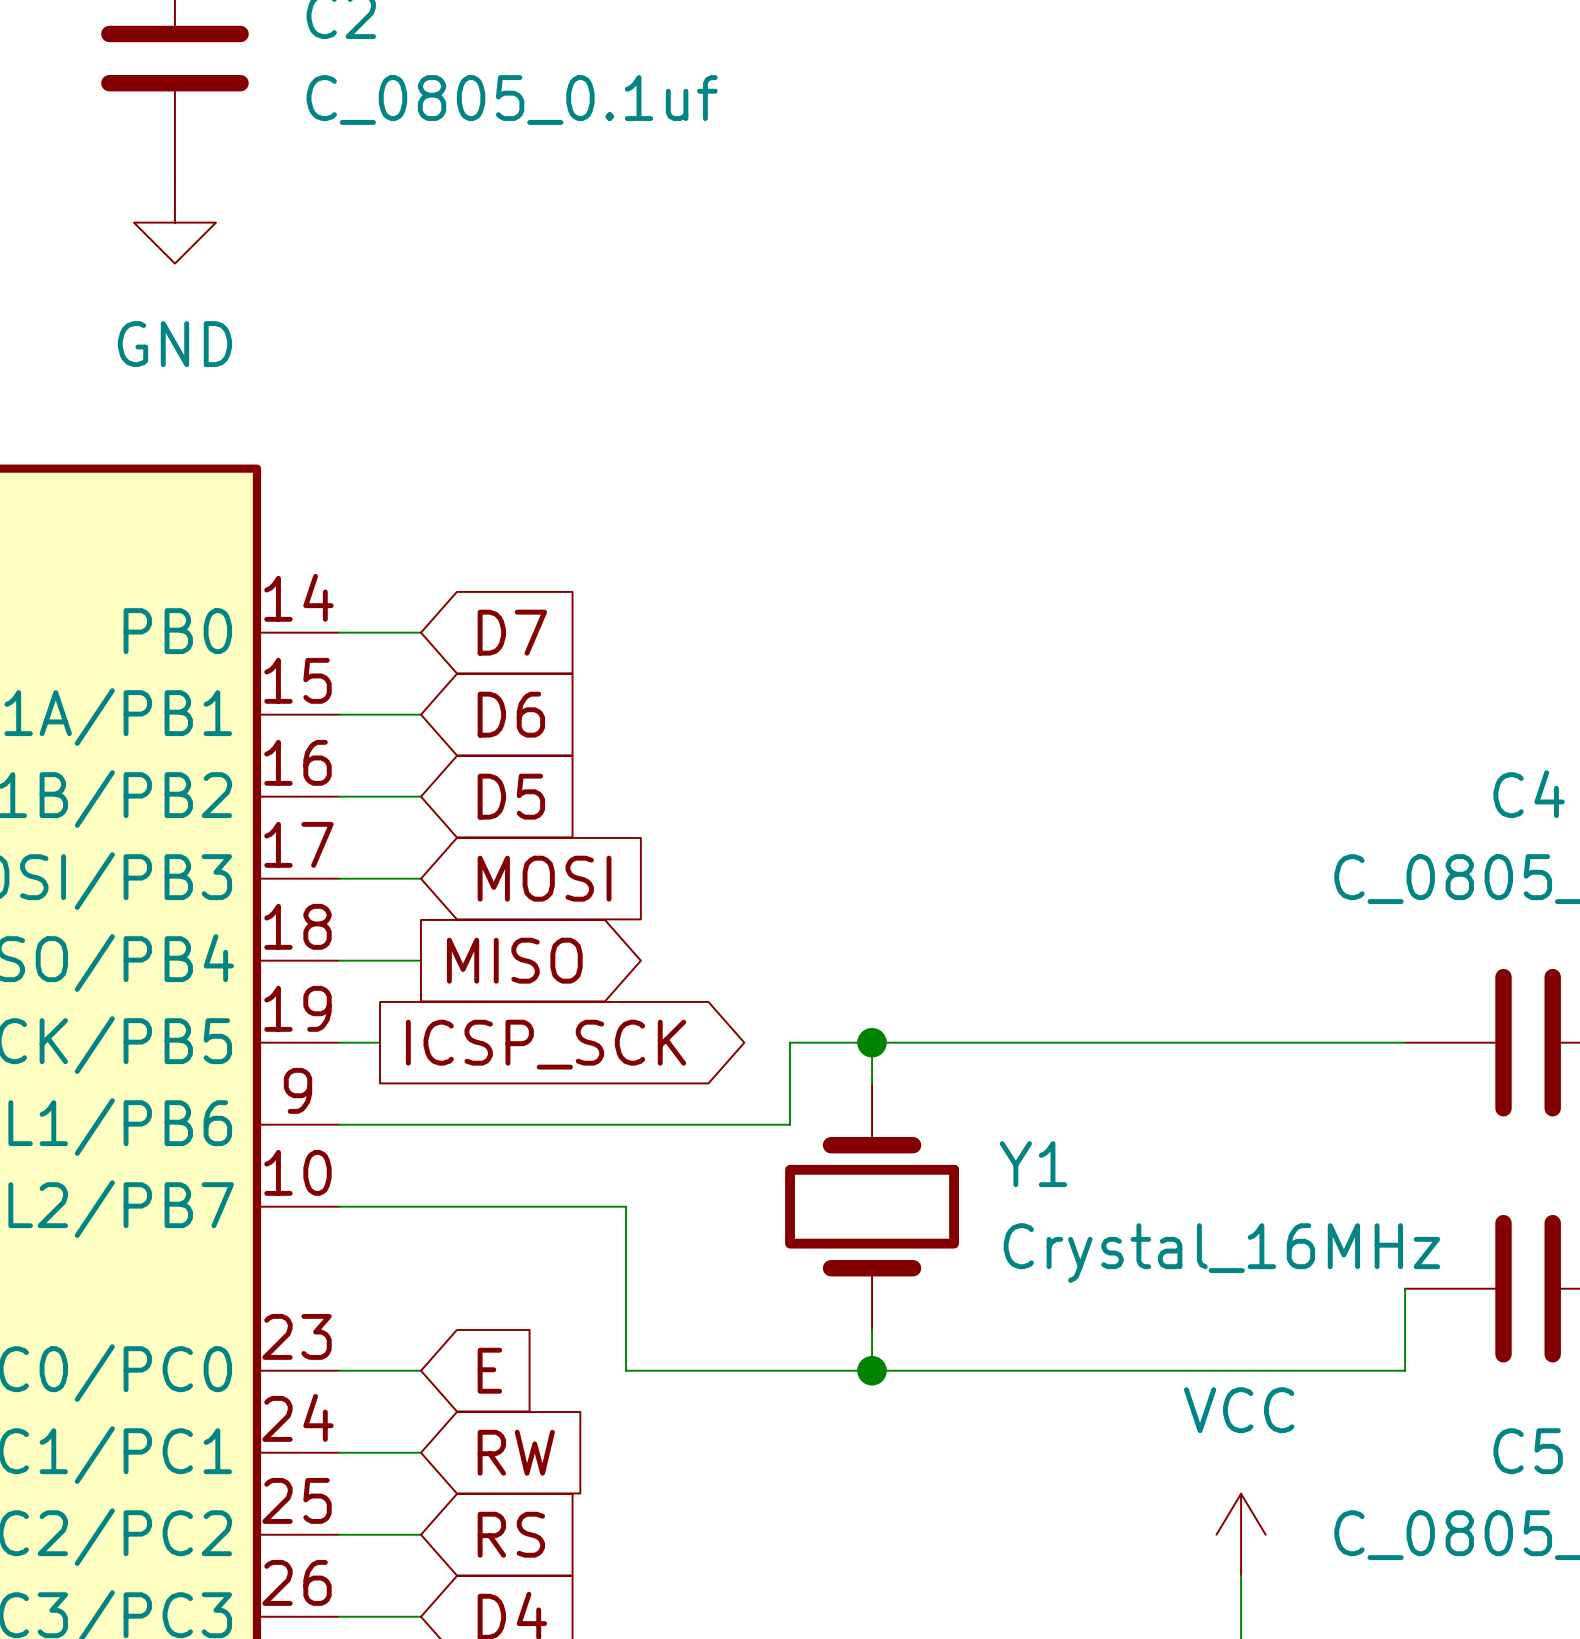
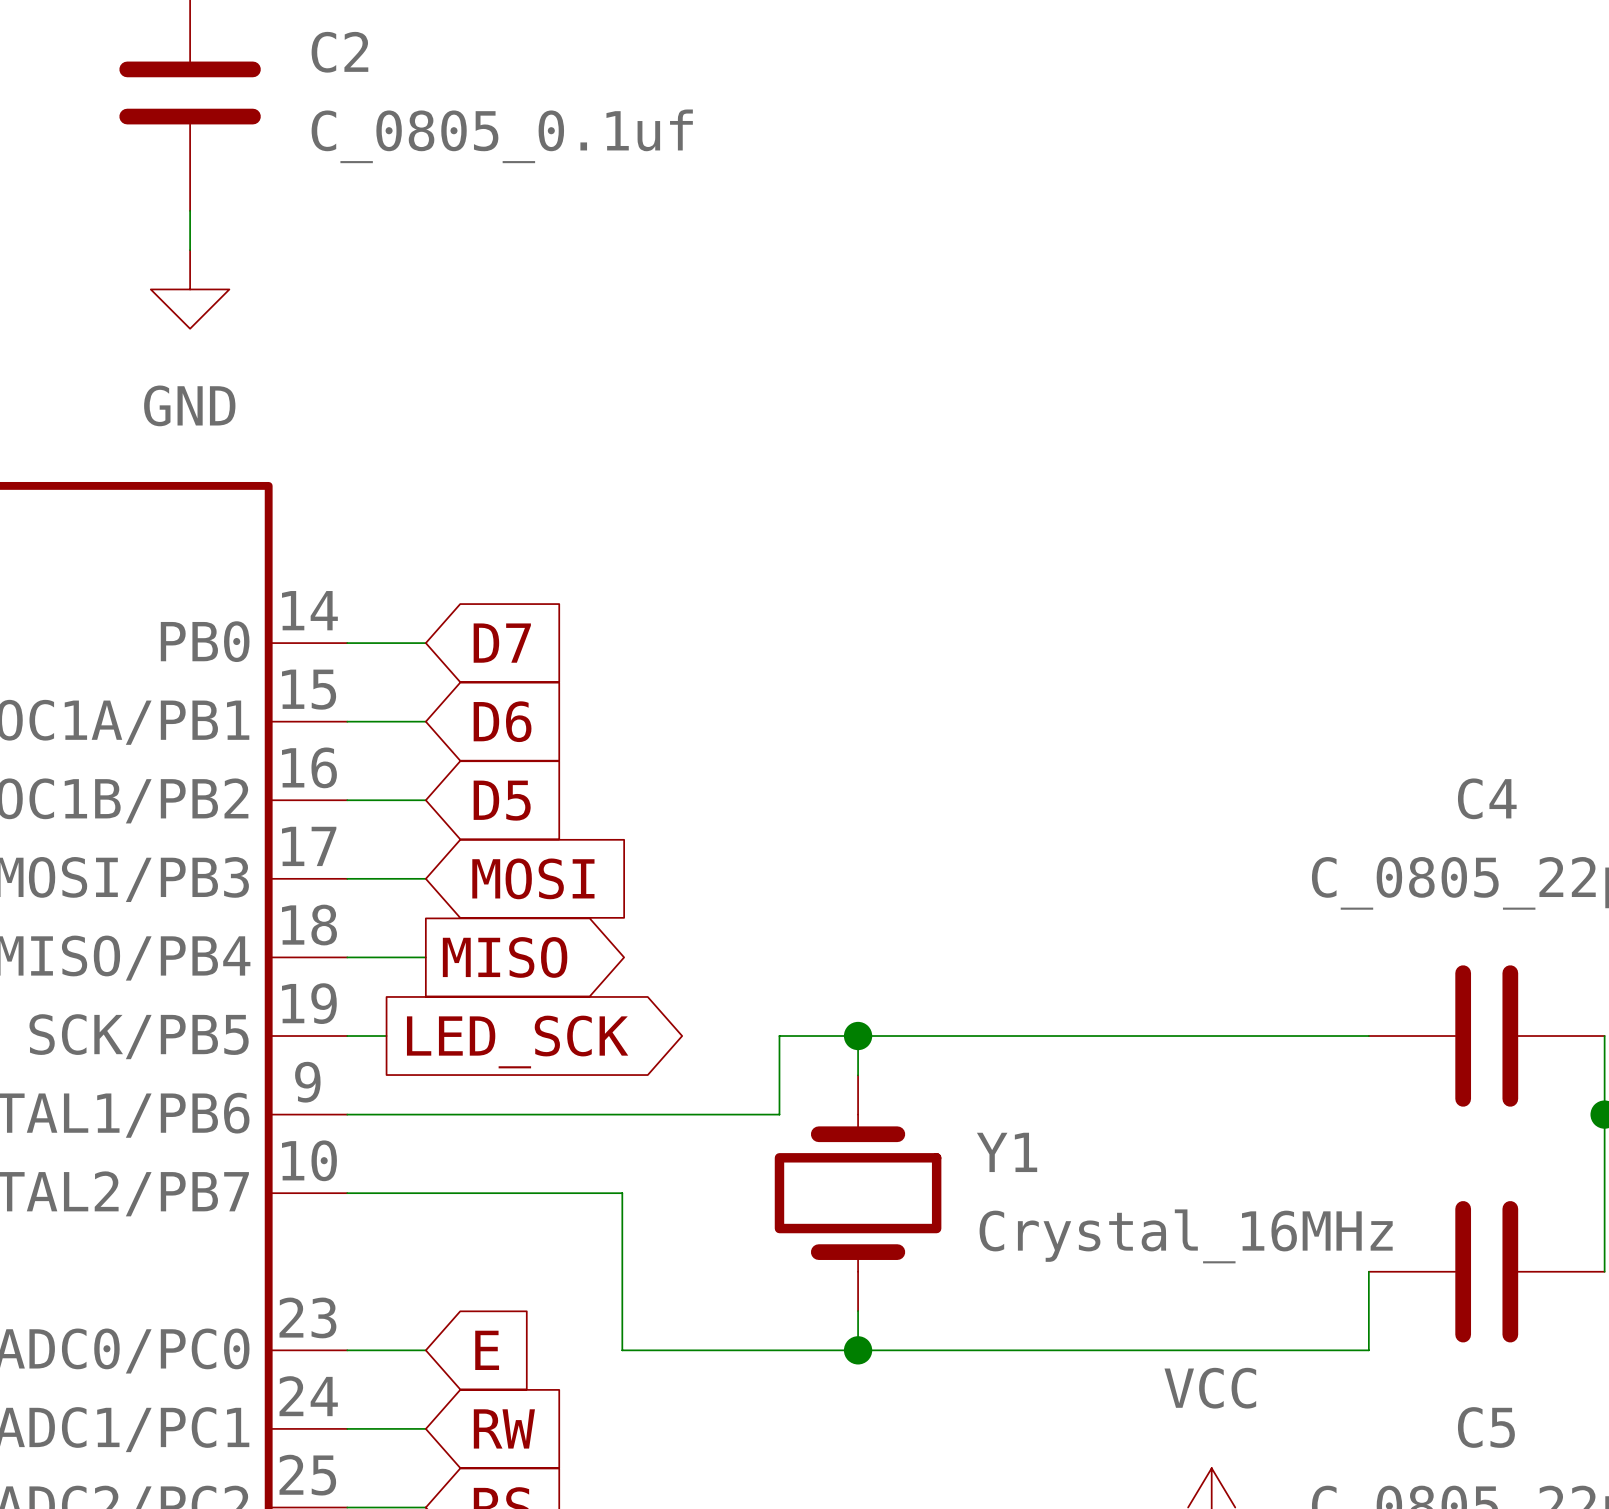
power symbol position: GND (174, 222) -> GND (190, 289)
global label: ICSP_SCK (546, 1044) -> LED_SCK (517, 1042)

